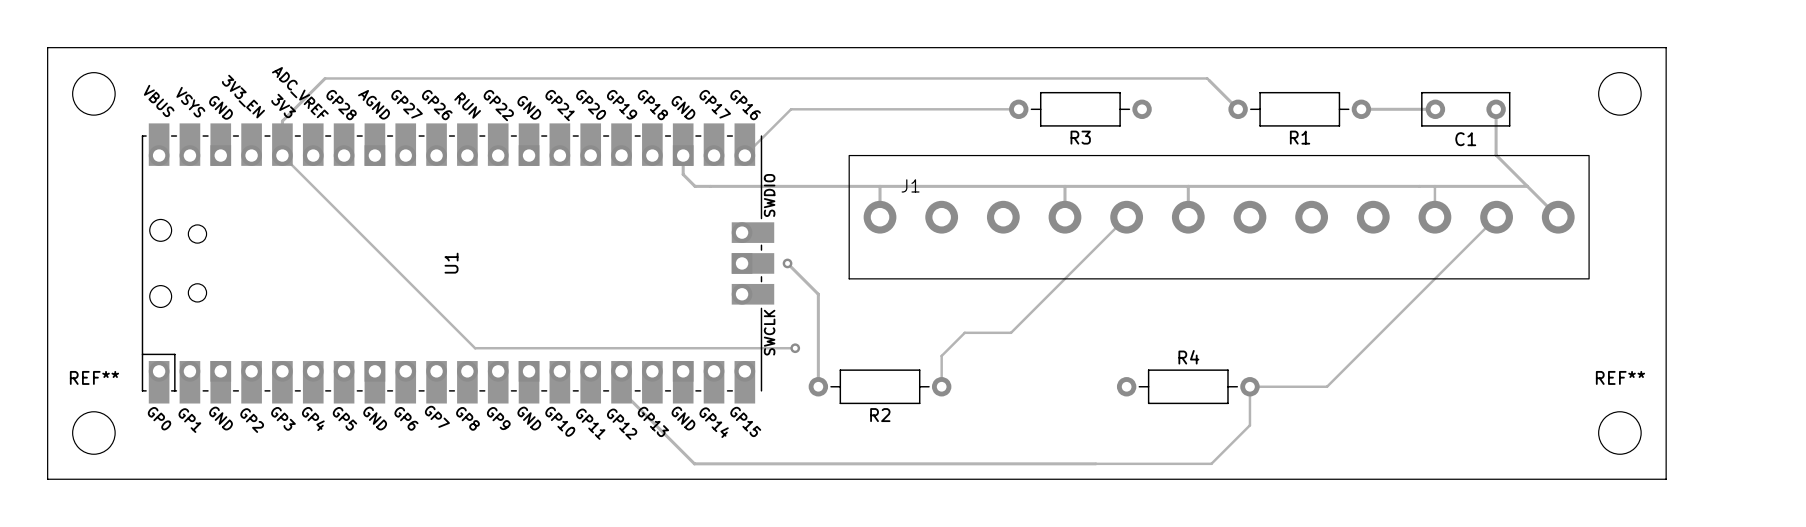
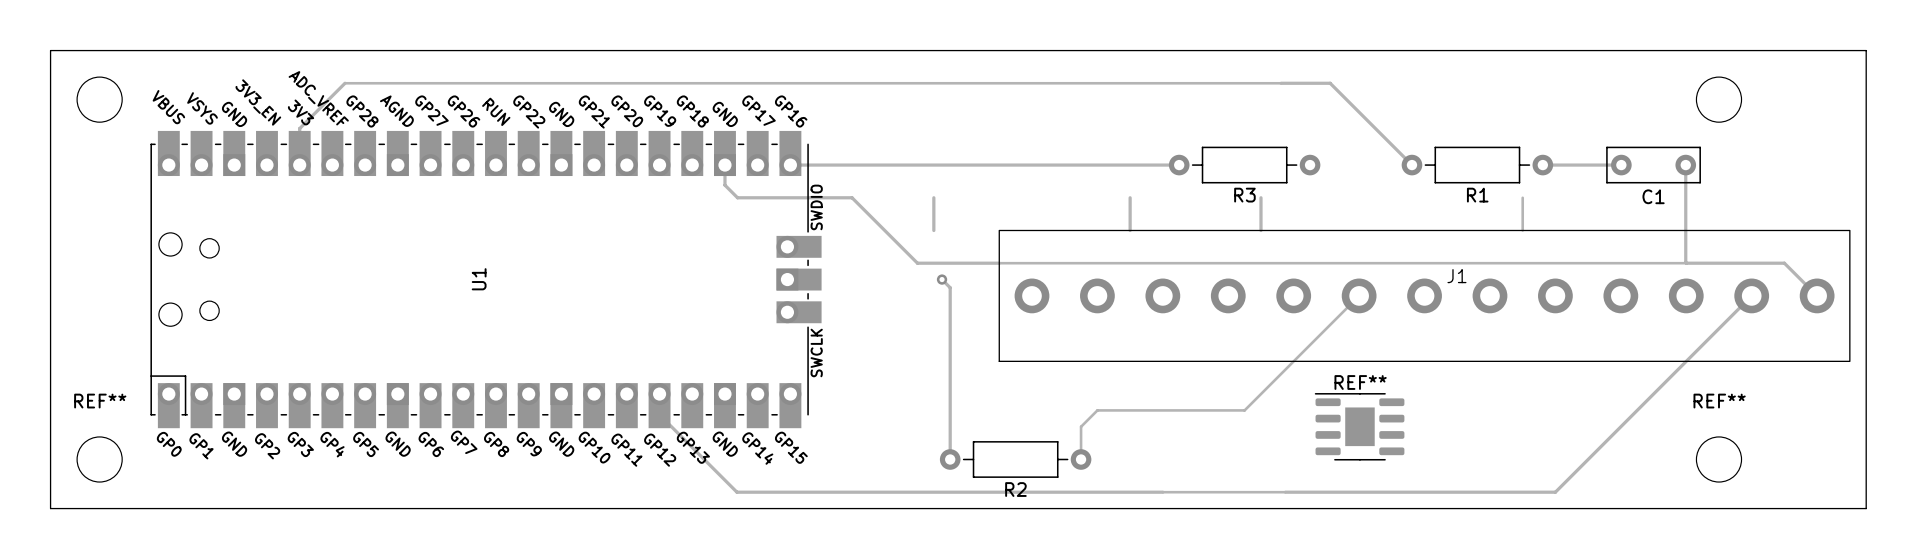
board edge: (1666, 47) (1666, 479) -> (1768, 50) (1866, 50) (1866, 508) (1768, 508)
track: (1207, 78) (1238, 109) -> (1281, 83) (1330, 83) (1411, 165)
track: (1018, 109) (791, 109) (744, 155) -> (1179, 165) (790, 165)
R3 position: (1080, 109) -> (1244, 165)
R1 position: (1299, 109) -> (1477, 165)
track: (1361, 109) (1435, 109) -> (1542, 165) (1621, 165)
C1 position: (1465, 109) -> (1653, 165)
track: (1496, 109) (1496, 155) (1558, 217) -> none
J1 footprint: [848, 154, 1590, 280] -> [998, 229, 1851, 362]
track: (282, 155) (475, 348) (795, 348) -> none
track: none -> (1685, 165) (1686, 263)
J1 name position: J1 (910, 185) -> J1 (1456, 276)
track: (802, 186) (1527, 186) -> (852, 197) (917, 263) (1686, 263)
track: (1126, 217) (1011, 332) (964, 332) (941, 355) (941, 386) -> none
track: (1496, 217) (1327, 386) (1249, 386) (1249, 425) (1211, 463) -> (1751, 295) (1555, 492) (1285, 492)
track: none -> (1686, 263) (1784, 263) (1817, 295) (1805, 307)
track: (787, 263) (818, 294) (818, 386) -> none
via: (787, 263) -> none
track: none -> (942, 279) (950, 287) (950, 459)
via: none -> (942, 279)
track: none -> (1359, 295) (1244, 410) (1097, 410) (1081, 426) (1081, 459)
via: (795, 348) -> none
R2 position: (880, 386) -> (1015, 459)
R4: (1188, 386) -> none
REF**: none -> (1359, 426)

